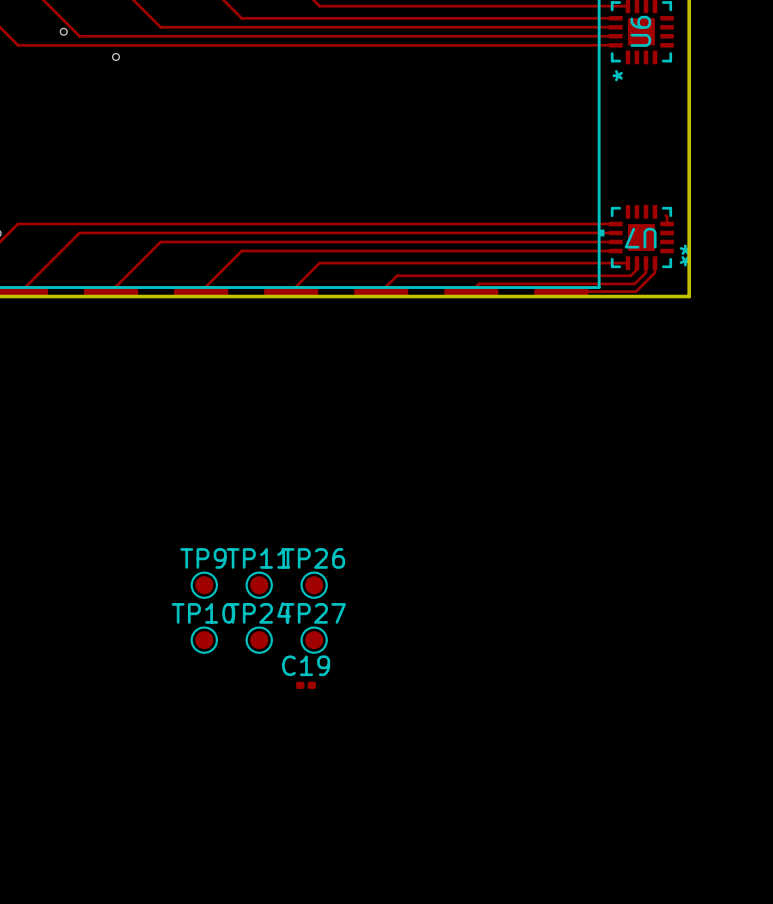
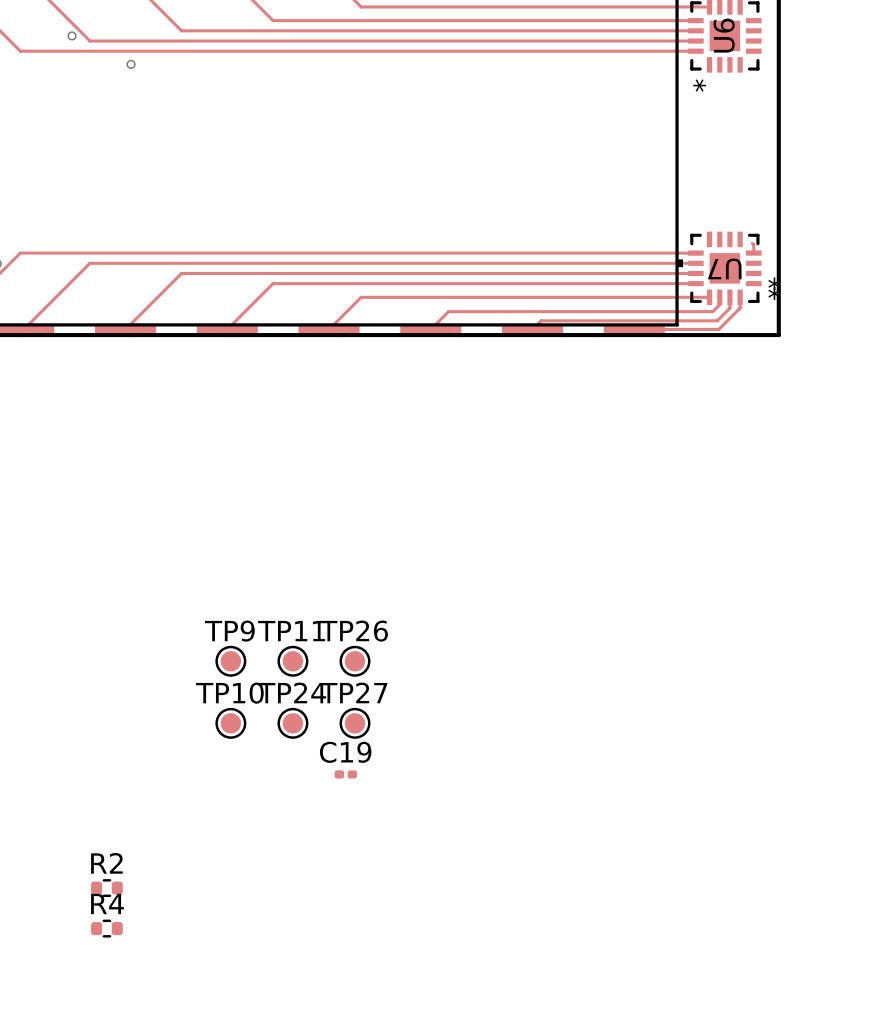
R2: none -> (106, 888)
R4: none -> (106, 928)

